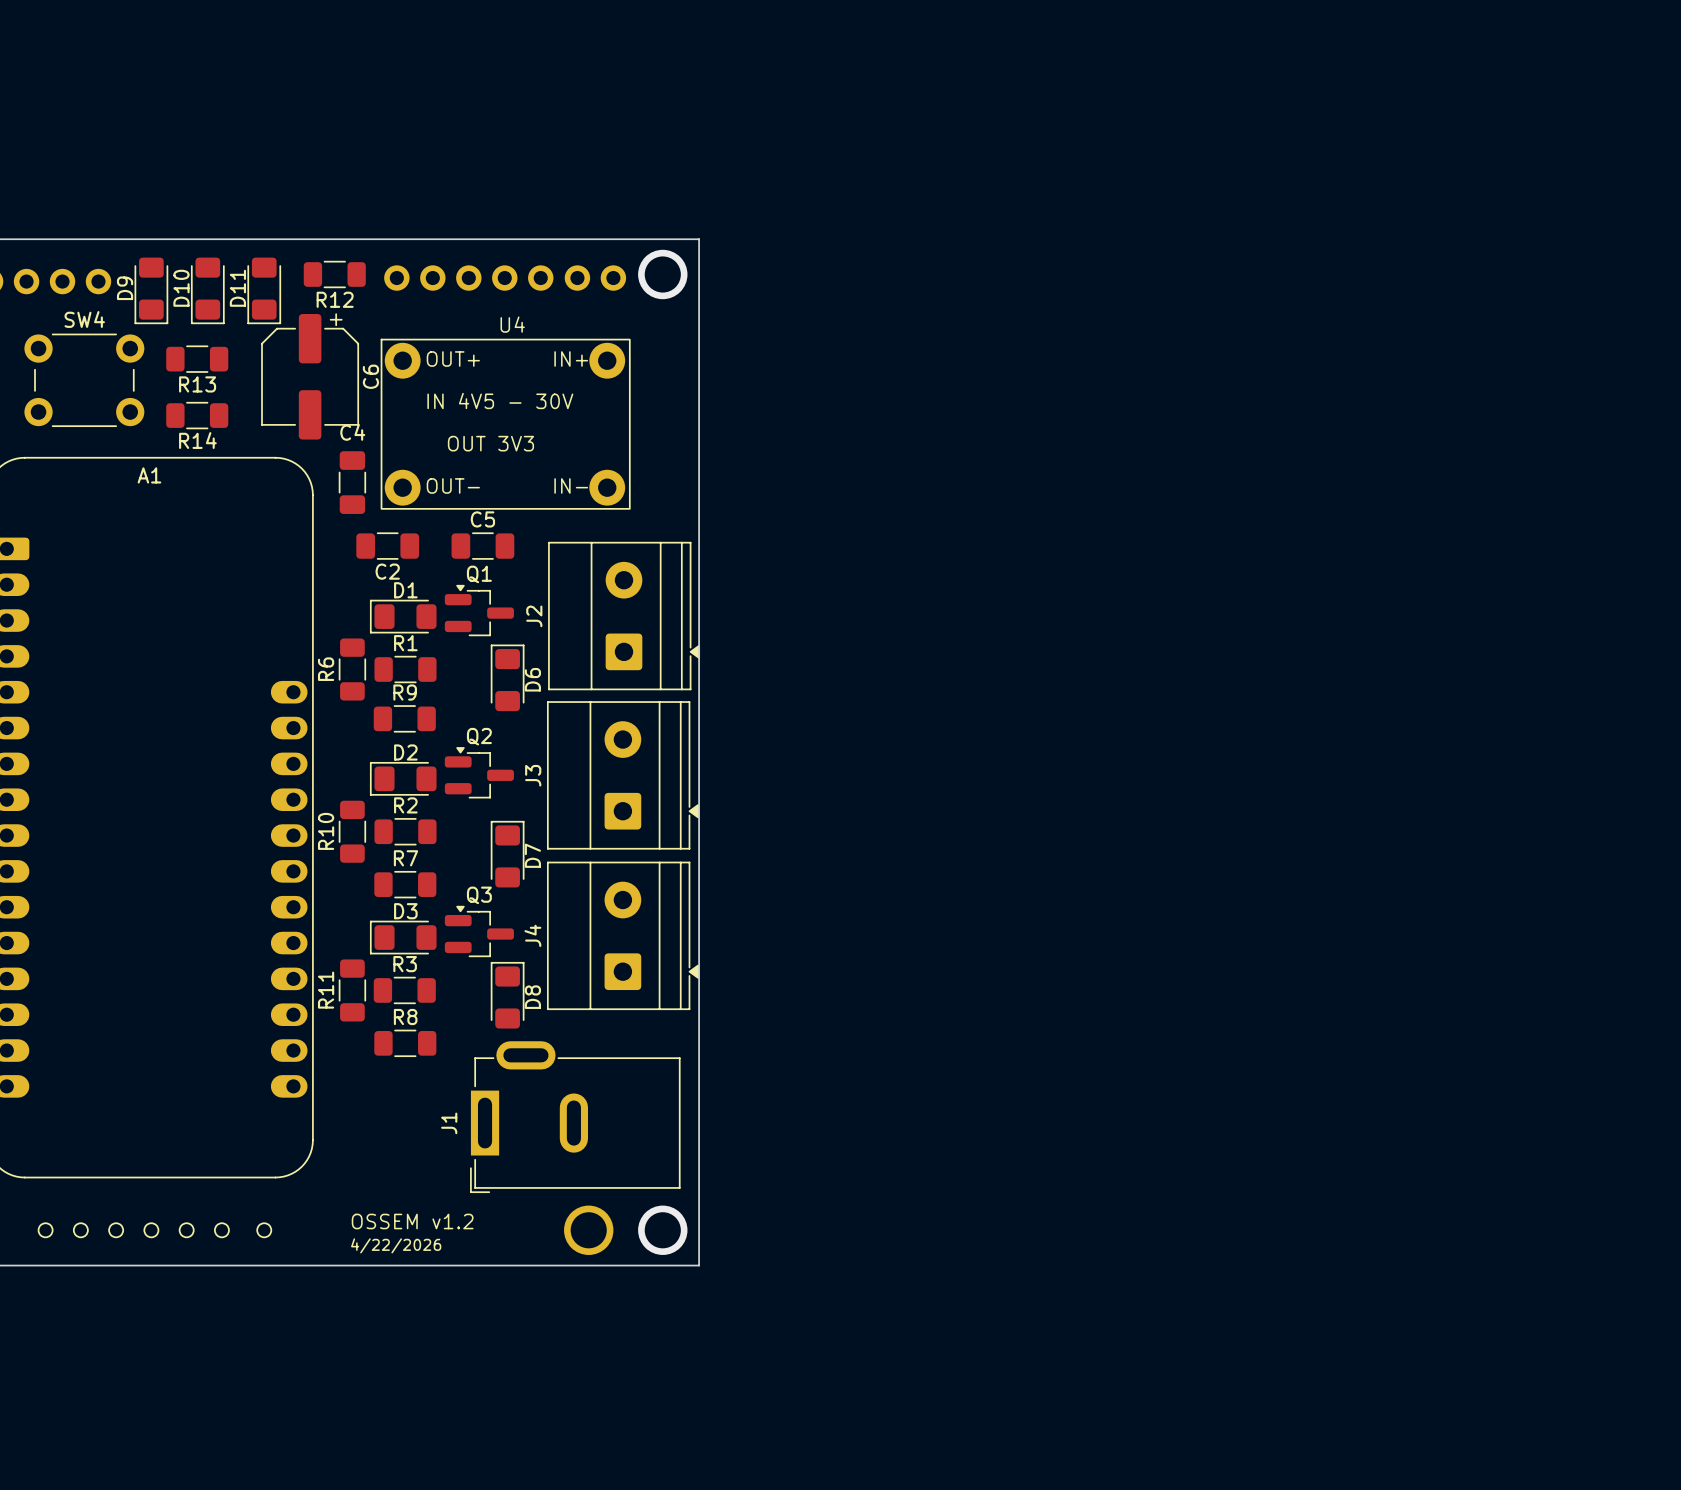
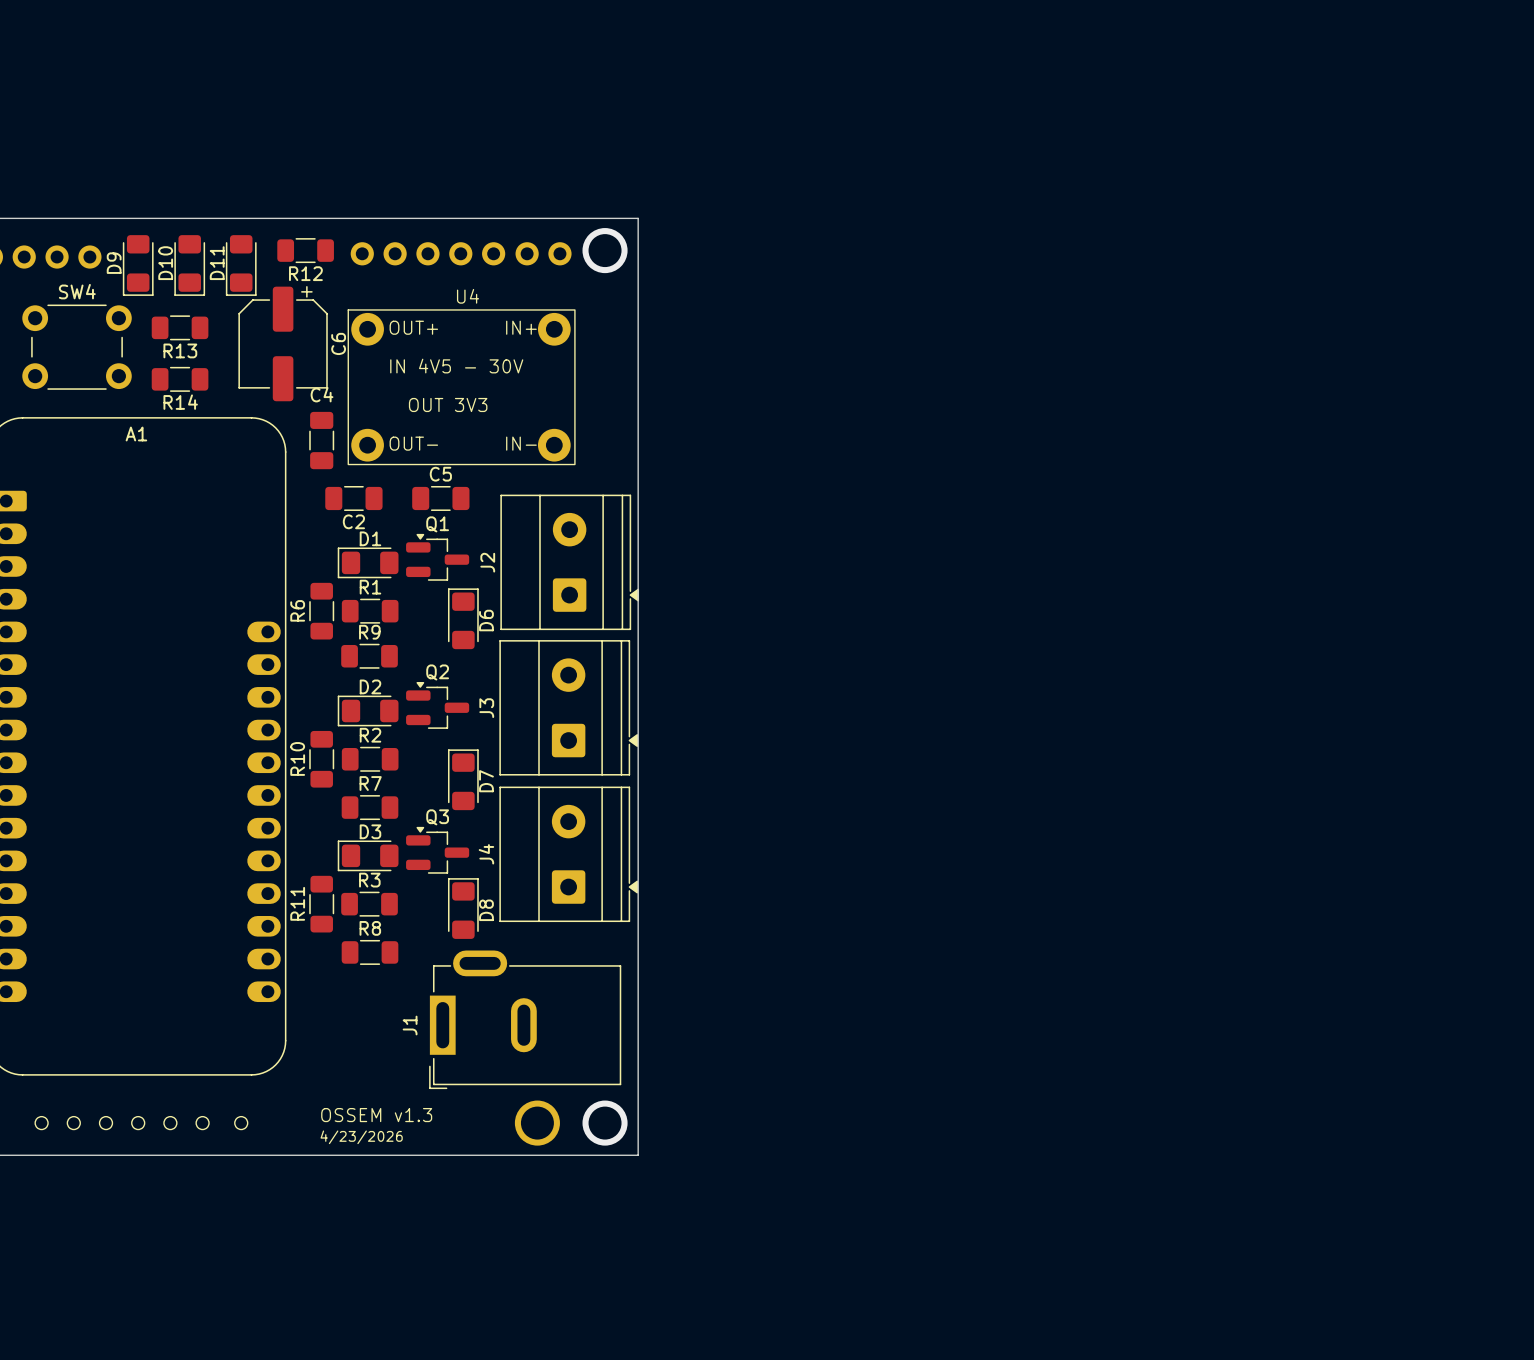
text: OSSEM v1.2 (412, 1221) -> OSSEM v1.3 (376, 1115)
text: 4/22/2026 (396, 1245) -> 4/23/2026 (361, 1137)

